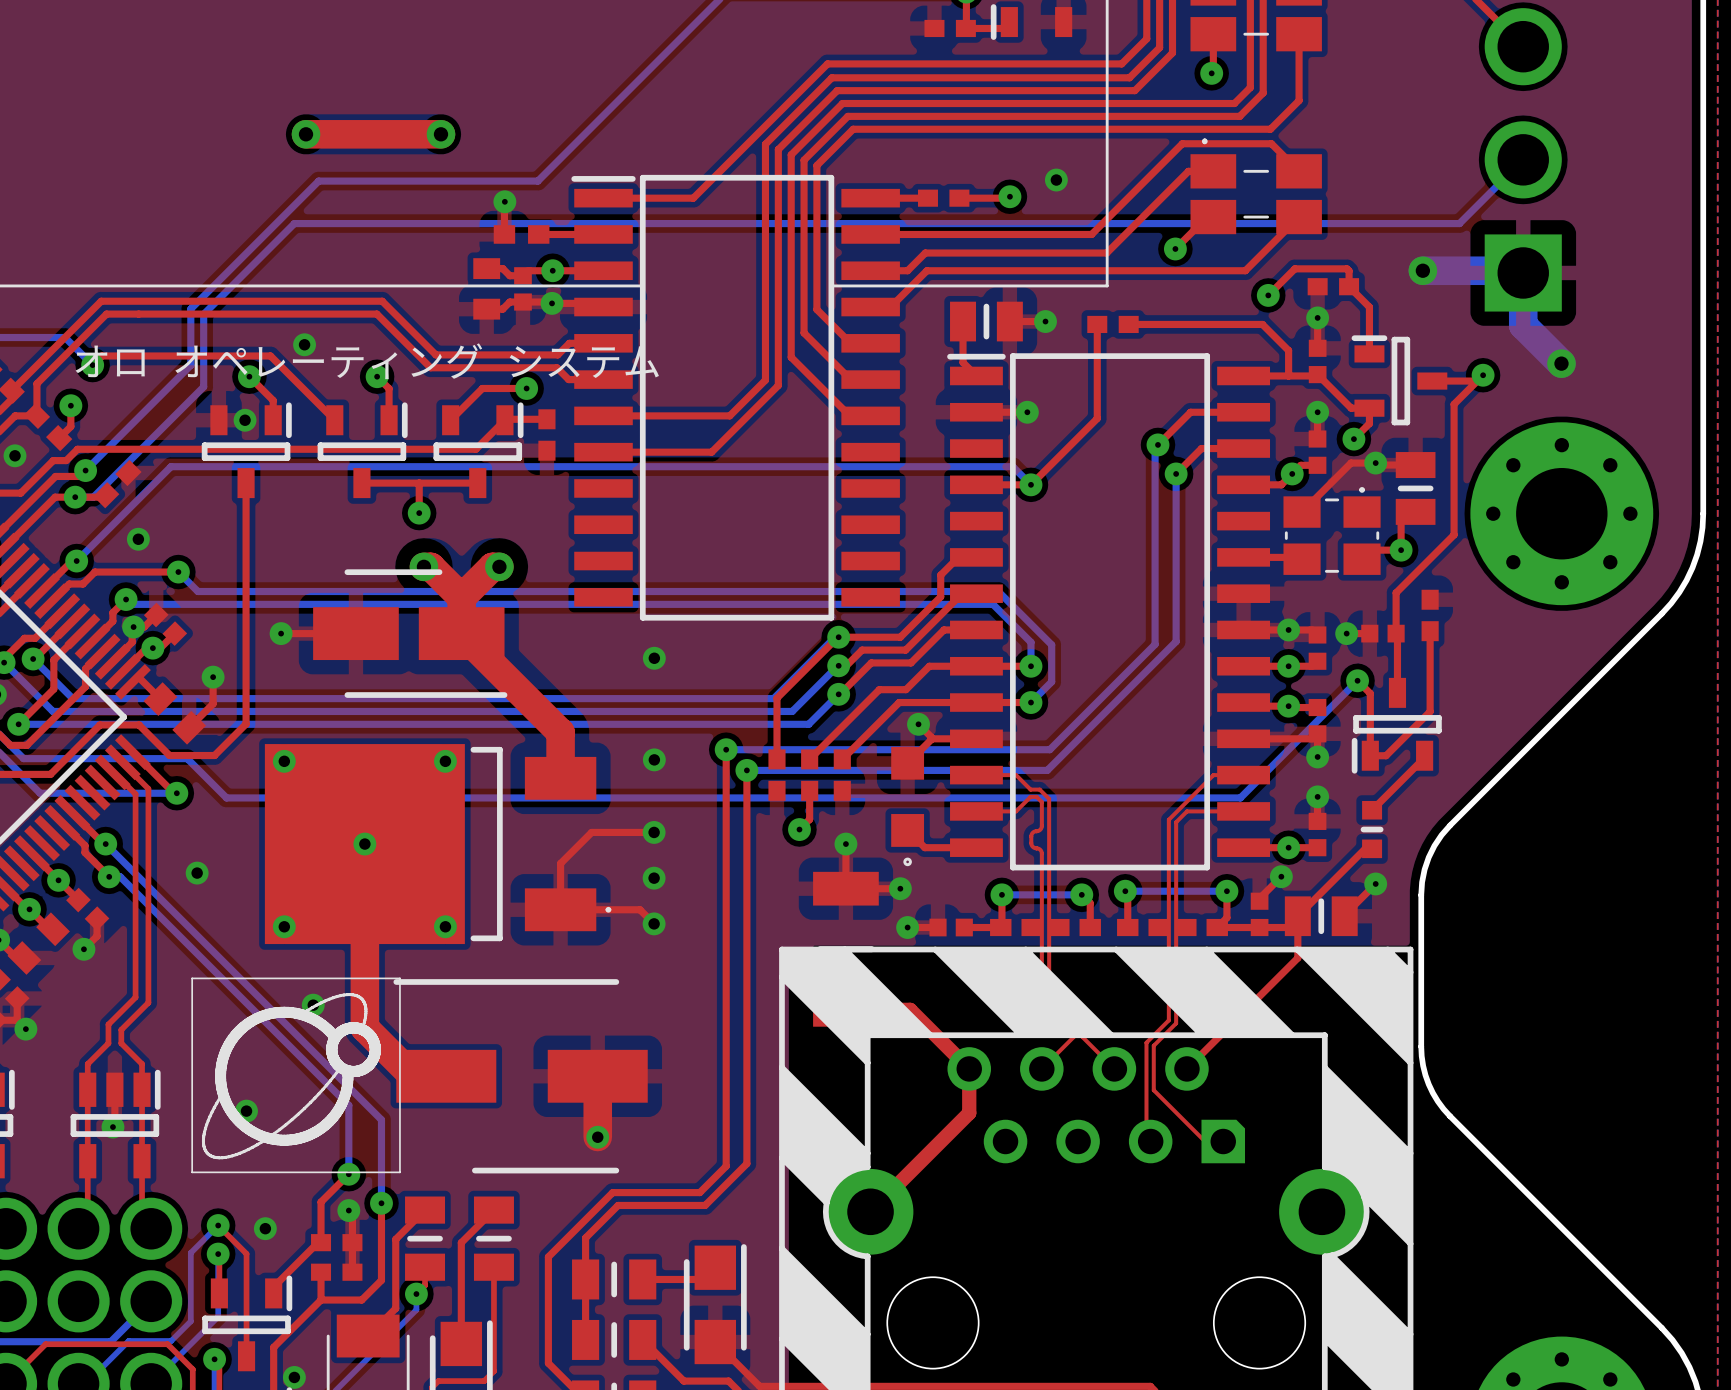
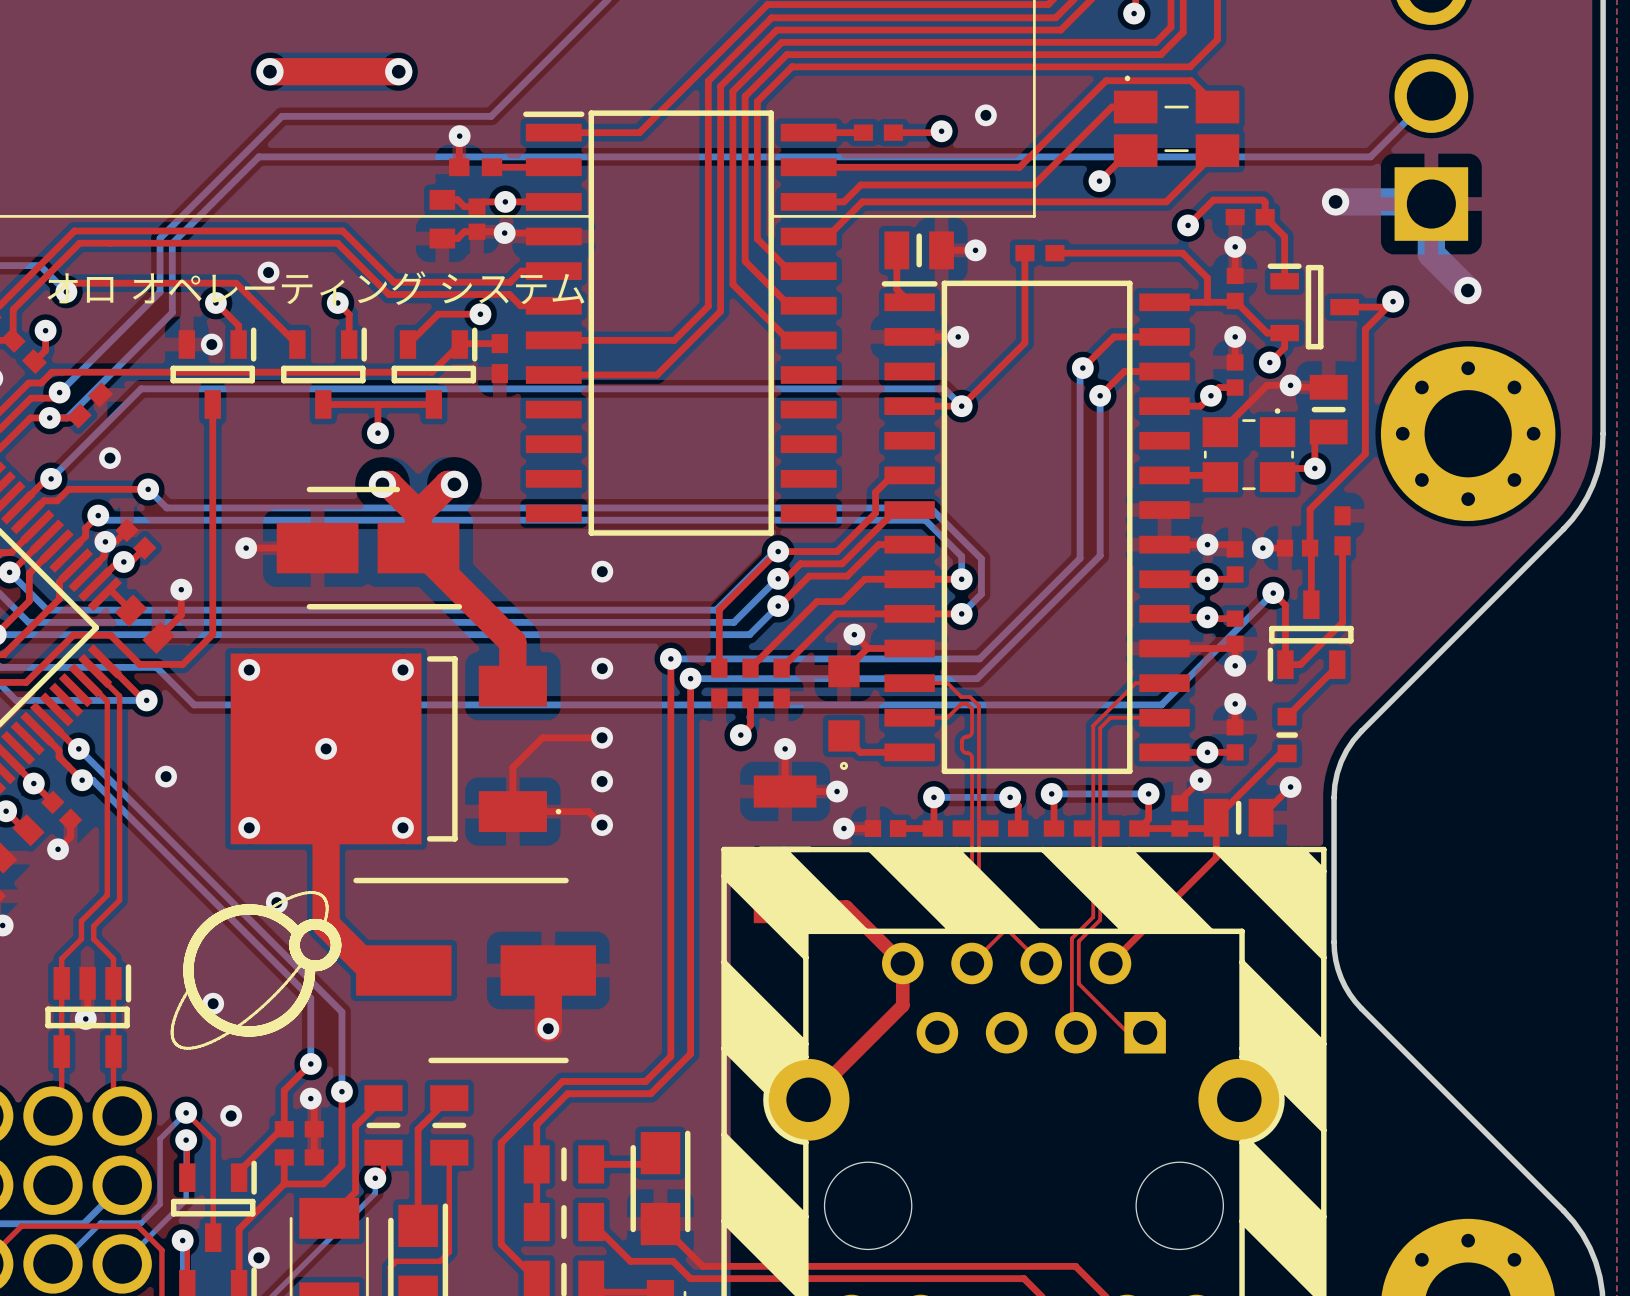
line: (192, 978) (399, 978) (399, 1172) (192, 1172) (192, 978) -> none

